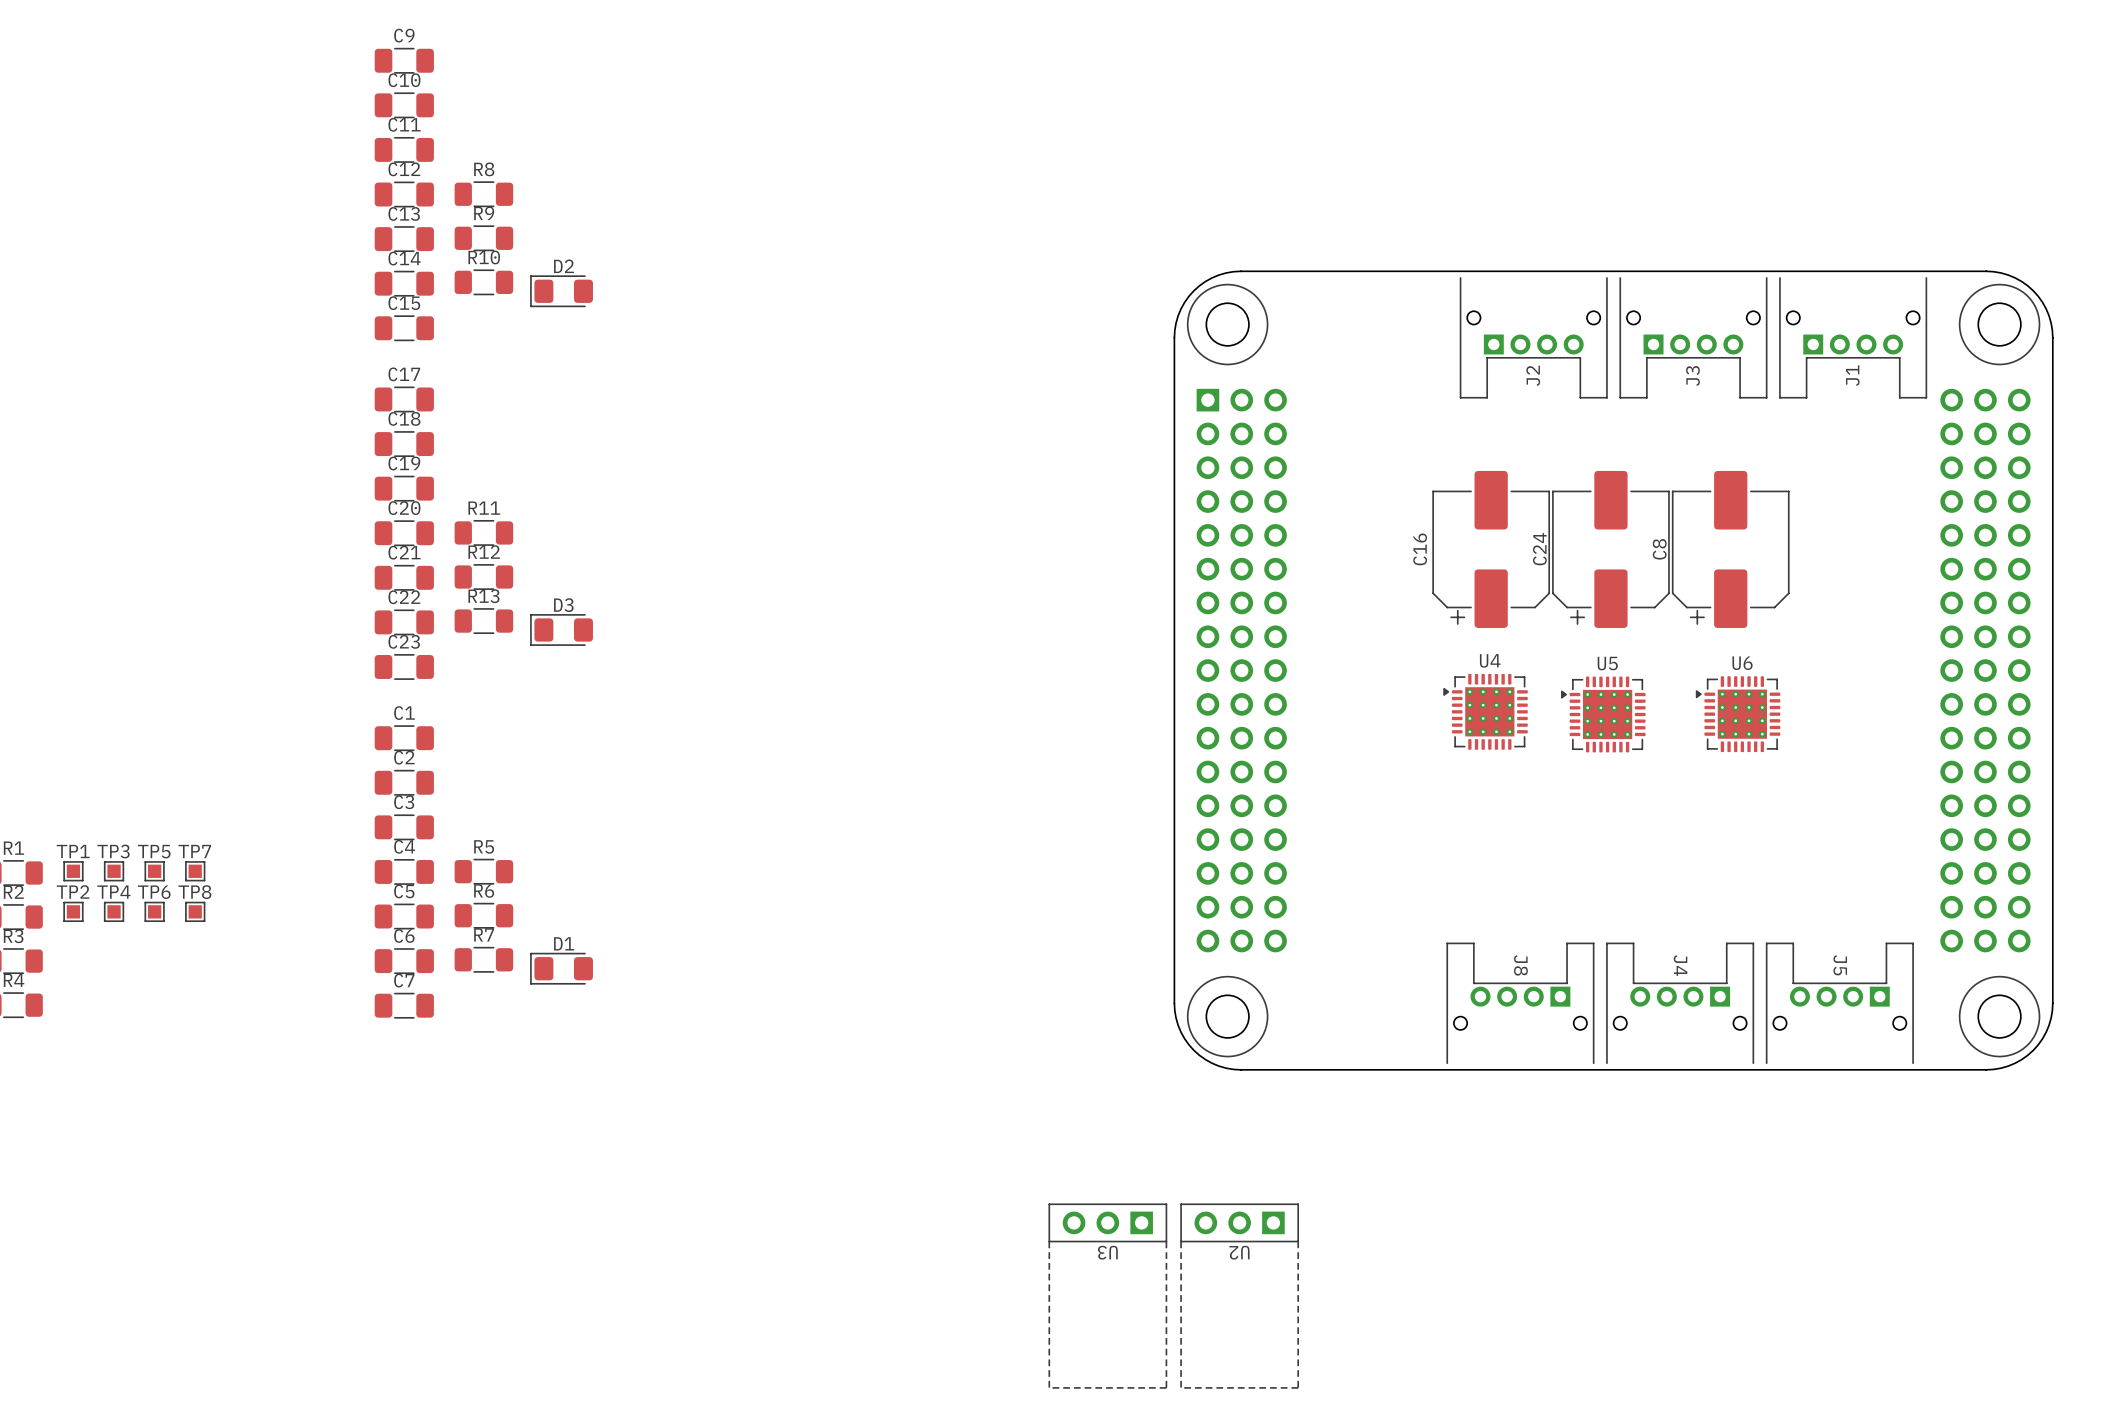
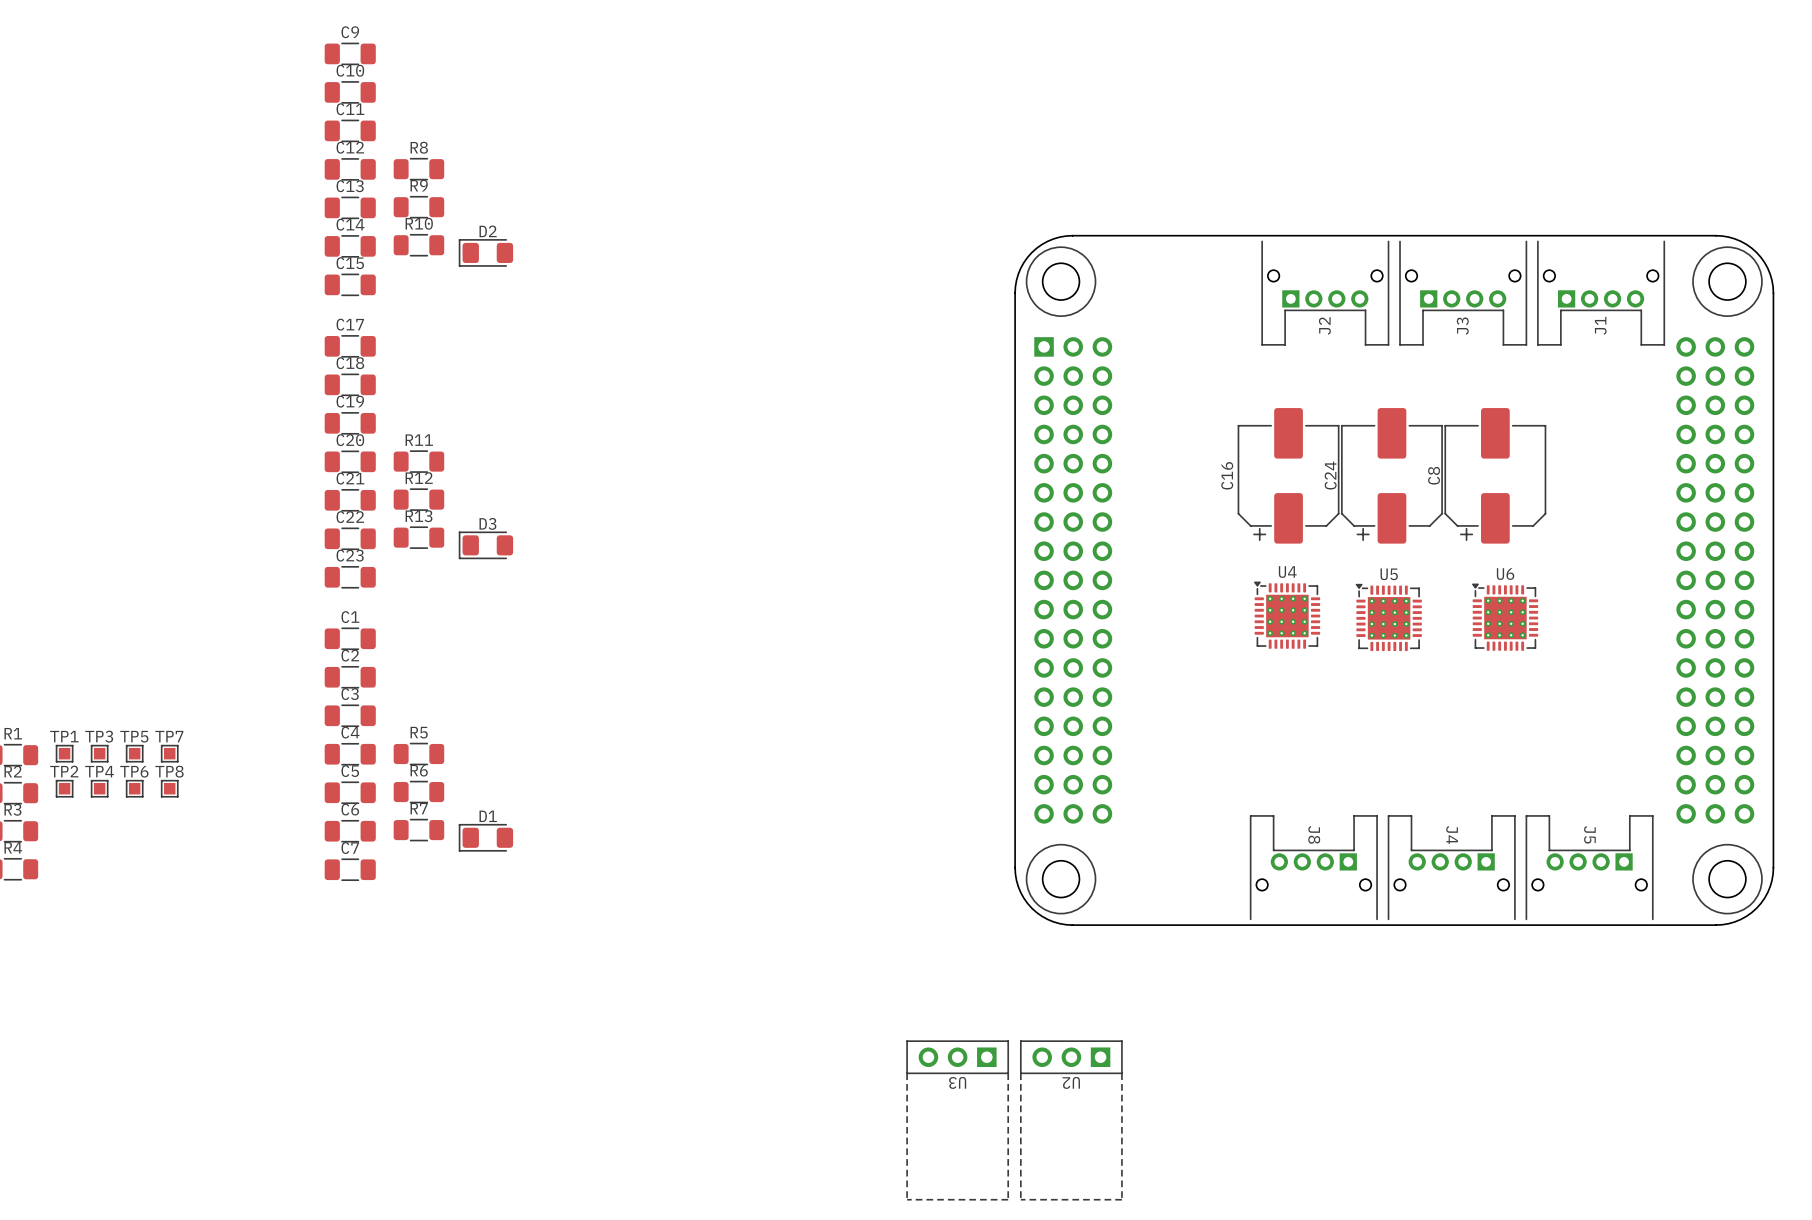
U4 footprint: [1443, 673, 1528, 750] -> [1253, 581, 1321, 649]
U5 footprint: [1561, 676, 1646, 753] -> [1355, 583, 1422, 652]
U6 footprint: [1695, 676, 1781, 753] -> [1471, 583, 1539, 651]

